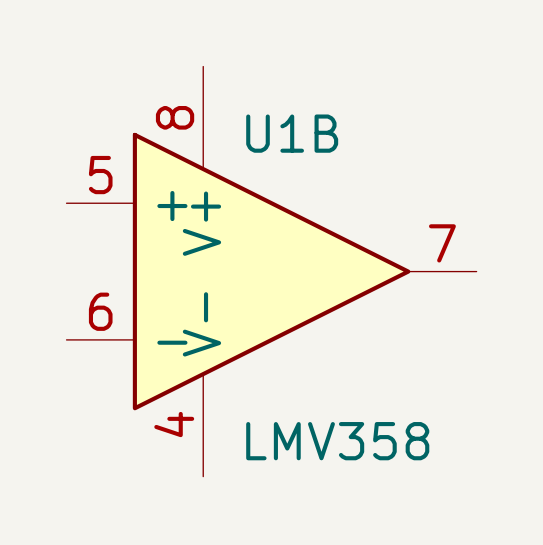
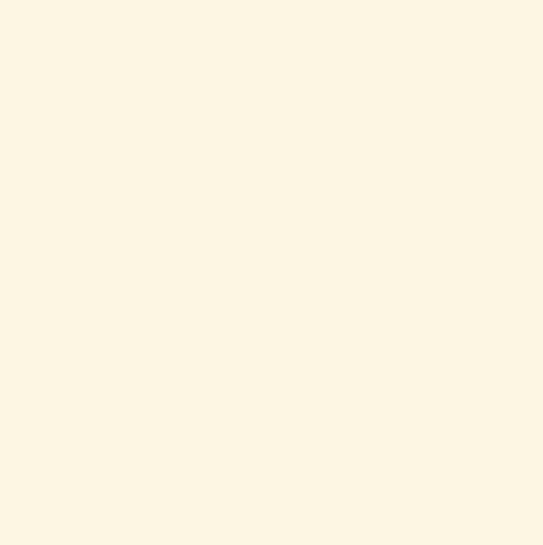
U1B: LMV358 (271, 271) -> none

